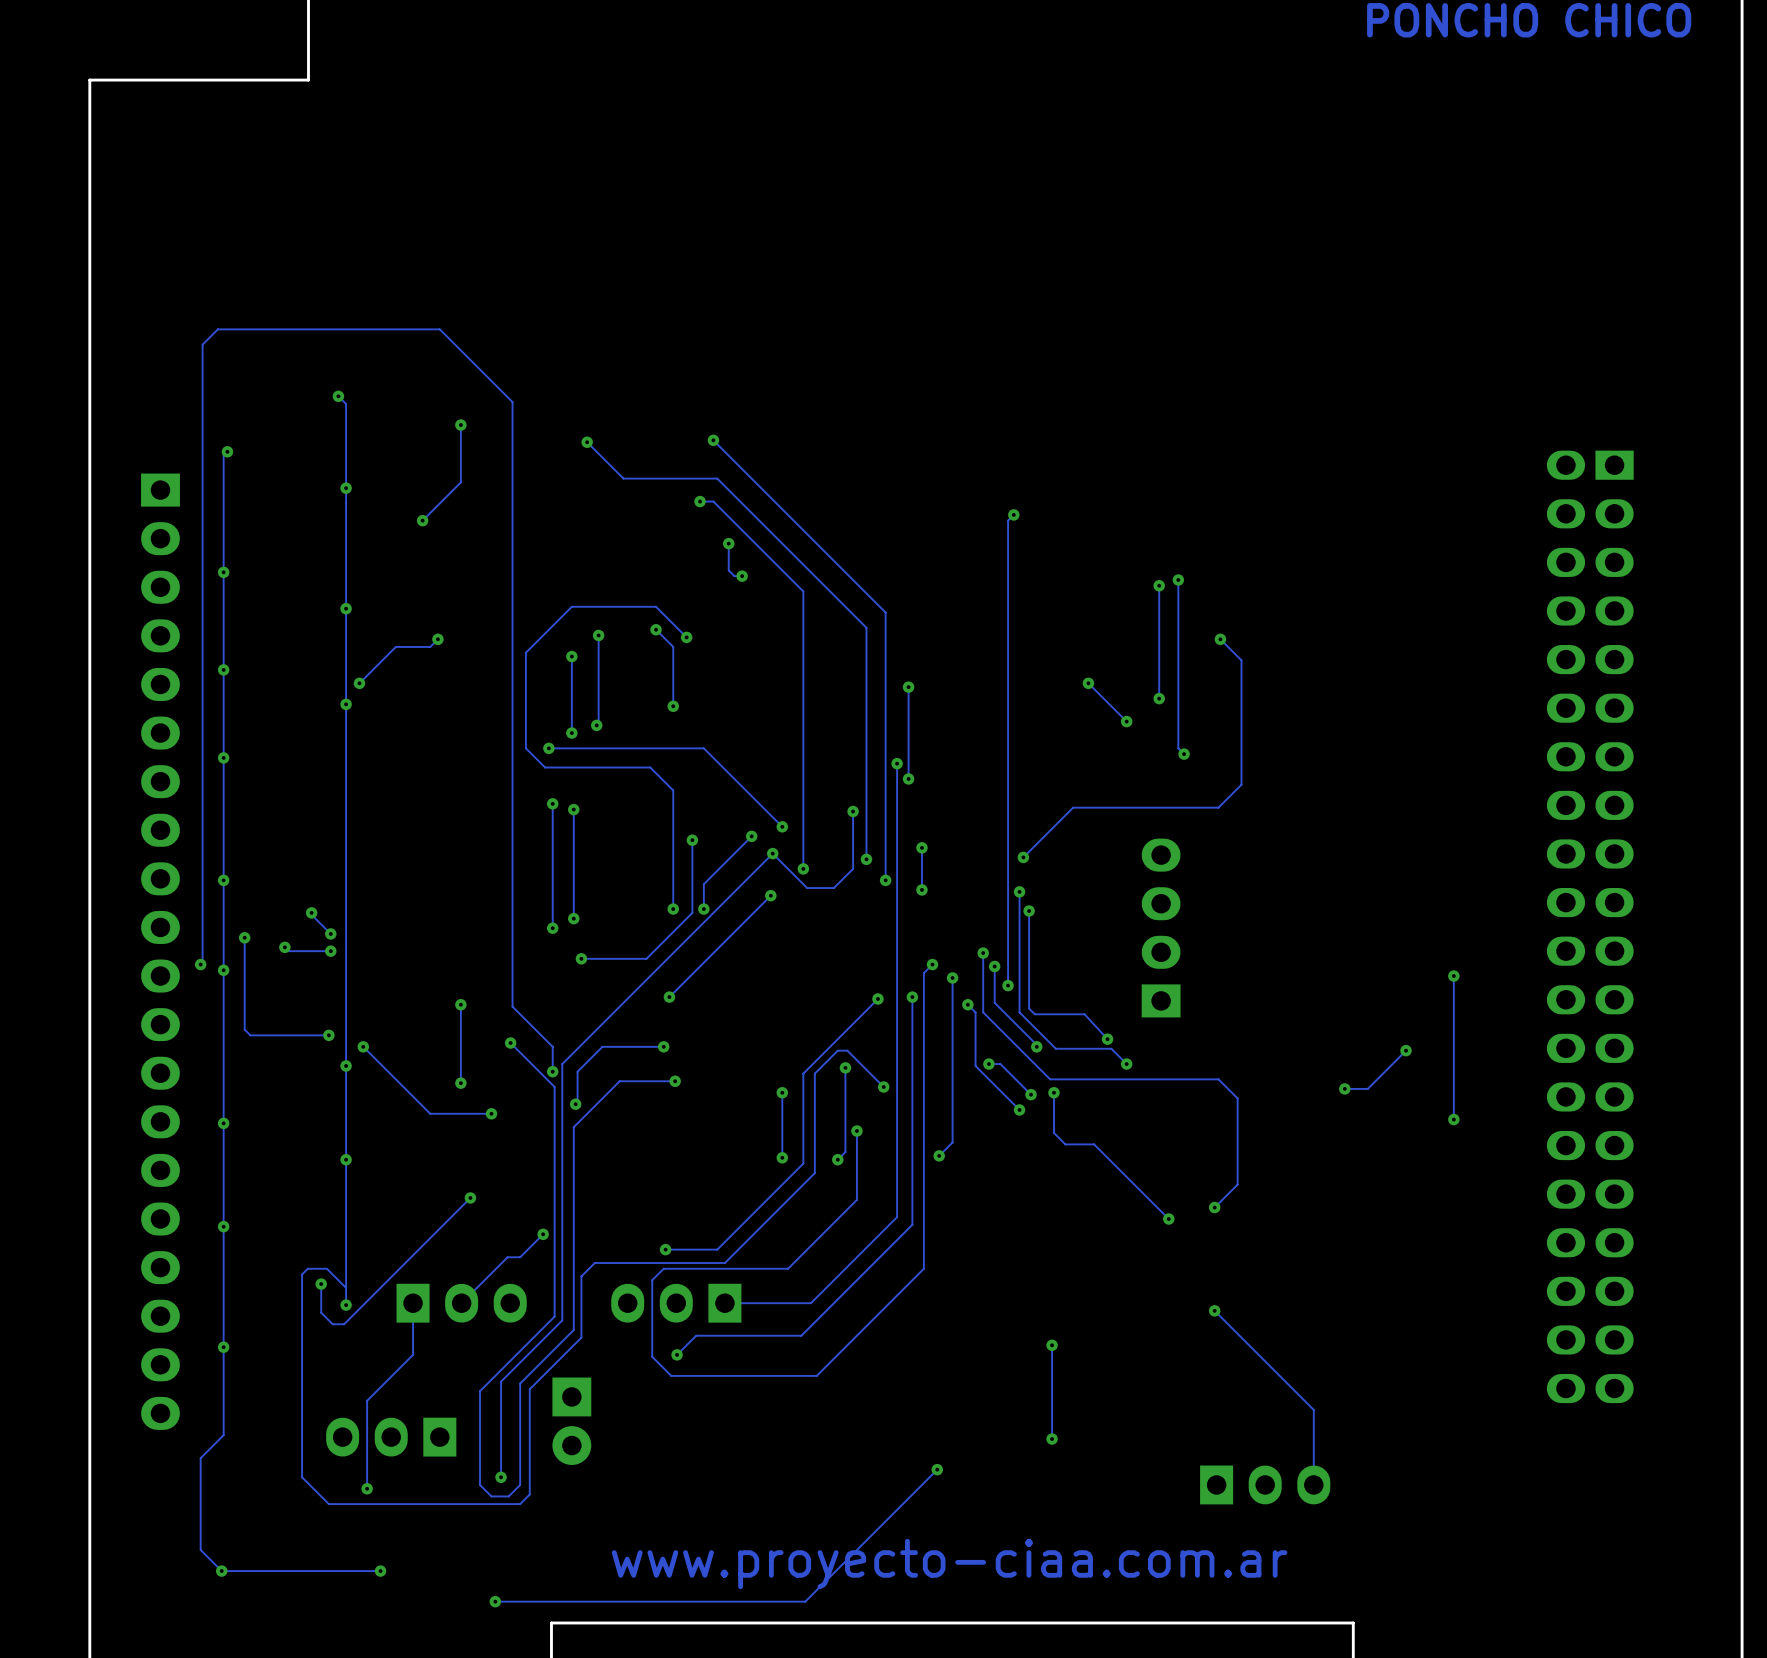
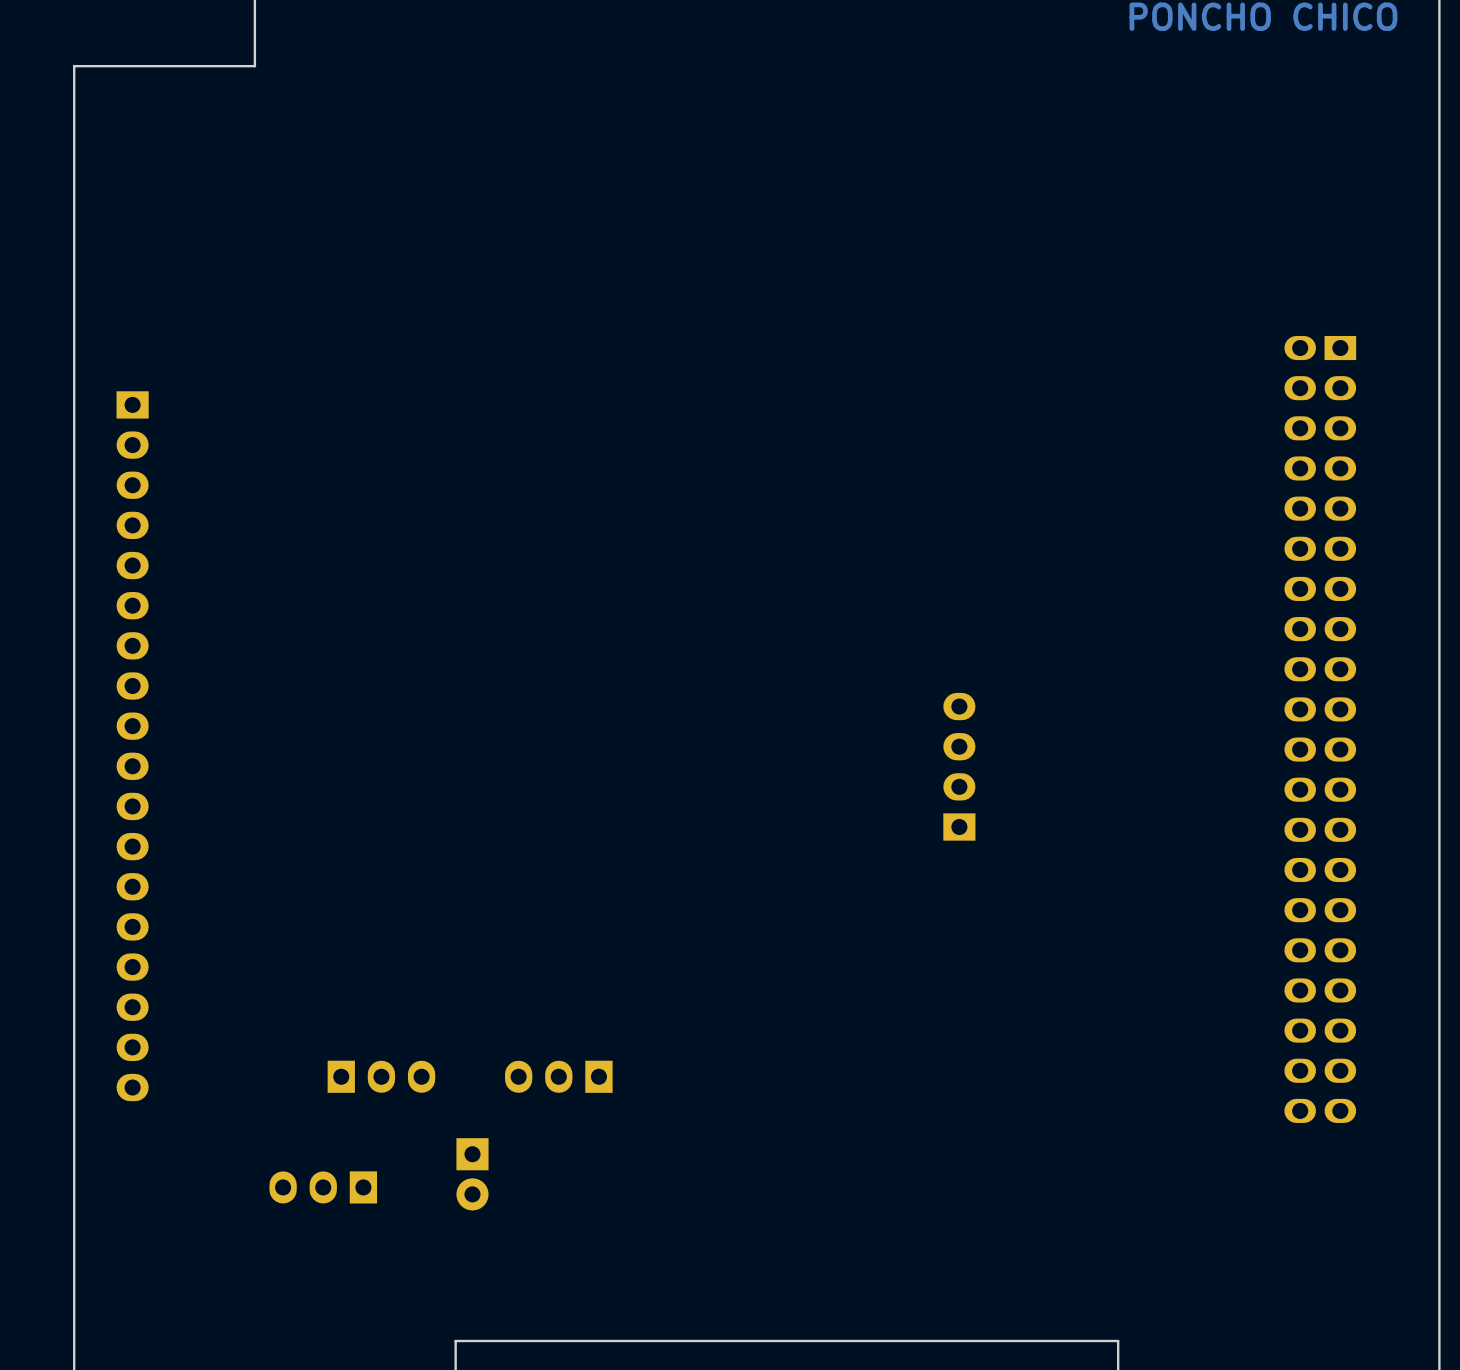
track: (338, 396) (346, 403) (346, 1305) -> none
via: (338, 396) -> none
track: (460, 425) (460, 482) (422, 520) -> none
via: (460, 425) -> none
track: (713, 440) (885, 612) (885, 880) -> none
via: (713, 440) -> none
track: (587, 442) (623, 478) (717, 478) (866, 627) (866, 859) -> none
via: (587, 442) -> none
track: (227, 451) (223, 455) (223, 1435) (200, 1458) (200, 1550) (221, 1571) (380, 1571) -> none
via: (227, 451) -> none
via: (346, 488) -> none
track: (700, 501) (713, 501) (803, 591) (803, 868) -> none
via: (700, 501) -> none
track: (1013, 514) (1008, 520) (1008, 985) -> none
via: (1013, 514) -> none
via: (422, 520) -> none
track: (728, 543) (728, 570) (734, 576) (742, 576) -> none
via: (728, 543) -> none
via: (223, 572) -> none
via: (742, 576) -> none
track: (1178, 580) (1178, 748) (1184, 754) -> none
via: (1178, 580) -> none
track: (1159, 585) (1159, 698) -> none
via: (1159, 585) -> none
via: (346, 608) -> none
track: (656, 629) (673, 646) (673, 706) -> none
via: (656, 629) -> none
track: (598, 635) (598, 723) (596, 725) -> none
via: (598, 635) -> none
track: (686, 637) (656, 606) (571, 606) (525, 652) (525, 748) (545, 767) (650, 767) (673, 790) (673, 909) -> none
via: (686, 637) -> none
track: (437, 639) (430, 646) (395, 646) (359, 683) -> none
via: (437, 639) -> none
track: (1220, 639) (1241, 660) (1241, 784) (1218, 807) (1073, 807) (1023, 857) -> none
via: (1220, 639) -> none
track: (571, 656) (571, 733) -> none
via: (571, 656) -> none
via: (223, 669) -> none
via: (359, 683) -> none
track: (1088, 683) (1126, 721) -> none
via: (1088, 683) -> none
track: (908, 687) (908, 778) -> none
via: (908, 687) -> none
via: (1159, 698) -> none
via: (346, 704) -> none
via: (673, 706) -> none
via: (1126, 721) -> none
via: (596, 725) -> none
via: (571, 733) -> none
track: (548, 748) (703, 748) (782, 826) -> none
via: (548, 748) -> none
via: (1184, 754) -> none
via: (223, 757) -> none
track: (897, 763) (897, 1217) (811, 1303) (724, 1303) -> none
via: (897, 763) -> none
via: (908, 778) -> none
track: (552, 803) (552, 928) -> none
via: (552, 803) -> none
track: (573, 809) (573, 918) -> none
via: (573, 809) -> none
track: (853, 811) (853, 868) (833, 888) (807, 888) (772, 853) (562, 1064) (562, 1320) (501, 1381) (501, 1477) -> none
via: (853, 811) -> none
via: (782, 826) -> none
track: (751, 836) (703, 884) (703, 909) -> none
via: (751, 836) -> none
track: (692, 840) (692, 912) (646, 958) (581, 958) -> none
via: (692, 840) -> none
track: (921, 847) (921, 889) -> none
via: (921, 847) -> none
via: (772, 853) -> none
via: (1023, 857) -> none
via: (866, 859) -> none
via: (803, 868) -> none
via: (223, 880) -> none
via: (885, 880) -> none
via: (921, 889) -> none
track: (1019, 891) (1019, 1012) (1055, 1048) (1111, 1048) (1126, 1064) -> none
via: (1019, 891) -> none
track: (770, 895) (669, 997) -> none
via: (770, 895) -> none
via: (673, 909) -> none
via: (703, 909) -> none
track: (1029, 910) (1029, 1008) (1034, 1014) (1084, 1014) (1107, 1039) -> none
via: (1029, 910) -> none
track: (311, 912) (330, 933) -> none
via: (311, 912) -> none
via: (573, 918) -> none
part position: (1590, 926) -> (1320, 729)
via: (552, 928) -> none
via: (330, 933) -> none
track: (244, 937) (244, 1029) (250, 1035) (328, 1035) -> none
via: (244, 937) -> none
track: (284, 947) (288, 951) (330, 951) -> none
via: (284, 947) -> none
part: (160, 951) -> none
via: (330, 951) -> none
track: (983, 953) (983, 1012) (1050, 1079) (1218, 1079) (1237, 1098) (1237, 1184) (1214, 1207) -> none
via: (983, 953) -> none
via: (581, 958) -> none
track: (200, 964) (202, 962) (202, 344) (217, 329) (439, 329) (512, 402) (512, 1006) (552, 1046) (552, 1071) -> none
via: (200, 964) -> none
track: (932, 964) (923, 973) (923, 1268) (816, 1375) (671, 1375) (652, 1356) (652, 1280) (663, 1268) (788, 1268) (856, 1199) (856, 1131) -> none
via: (932, 964) -> none
track: (994, 966) (994, 1002) (1036, 1046) -> none
via: (994, 966) -> none
via: (223, 970) -> none
track: (1453, 976) (1453, 1119) -> none
via: (1453, 976) -> none
track: (952, 977) (952, 1142) (939, 1155) -> none
via: (952, 977) -> none
via: (1008, 985) -> none
via: (669, 997) -> none
track: (912, 997) (912, 1224) (801, 1335) (696, 1335) (677, 1354) -> none
via: (912, 997) -> none
track: (877, 999) (803, 1073) (803, 1163) (717, 1249) (665, 1249) -> none
via: (877, 999) -> none
track: (460, 1004) (460, 1083) -> none
via: (460, 1004) -> none
track: (967, 1004) (975, 1012) (975, 1065) (1019, 1109) -> none
via: (967, 1004) -> none
via: (328, 1035) -> none
via: (1107, 1039) -> none
track: (510, 1043) (554, 1087) (554, 1316) (480, 1391) (480, 1484) (491, 1496) (508, 1496) (520, 1484) (520, 1383) (573, 1329) (573, 1127) (619, 1081) (675, 1081) -> none
via: (510, 1043) -> none
track: (363, 1046) (430, 1113) (491, 1113) -> none
via: (363, 1046) -> none
track: (663, 1046) (602, 1046) (577, 1071) (577, 1102) (575, 1104) -> none
via: (663, 1046) -> none
via: (1036, 1046) -> none
track: (1406, 1050) (1367, 1088) (1344, 1088) -> none
via: (1406, 1050) -> none
track: (988, 1064) (1000, 1064) (1031, 1094) -> none
via: (988, 1064) -> none
via: (1126, 1064) -> none
via: (346, 1065) -> none
track: (845, 1067) (845, 1152) (837, 1159) -> none
via: (845, 1067) -> none
via: (552, 1071) -> none
via: (675, 1081) -> none
via: (460, 1083) -> none
track: (883, 1087) (847, 1050) (837, 1050) (814, 1073) (814, 1173) (724, 1263) (594, 1263) (581, 1276) (581, 1337) (529, 1389) (529, 1494) (520, 1504) (328, 1504) (302, 1477) (302, 1274) (307, 1268) (326, 1268) (346, 1287) -> none
via: (883, 1087) -> none
via: (1344, 1088) -> none
track: (782, 1092) (782, 1157) -> none
via: (782, 1092) -> none
track: (1053, 1092) (1053, 1132) (1065, 1144) (1094, 1144) (1168, 1219) -> none
via: (1053, 1092) -> none
via: (1031, 1094) -> none
via: (575, 1104) -> none
via: (1019, 1109) -> none
via: (491, 1113) -> none
via: (1453, 1119) -> none
via: (223, 1123) -> none
via: (856, 1131) -> none
via: (939, 1155) -> none
via: (782, 1157) -> none
via: (346, 1159) -> none
via: (837, 1159) -> none
track: (470, 1197) (344, 1324) (332, 1324) (321, 1312) (321, 1284) -> none
via: (470, 1197) -> none
via: (1214, 1207) -> none
via: (1168, 1219) -> none
via: (223, 1226) -> none
track: (543, 1234) (520, 1257) (507, 1257) (461, 1303) -> none
via: (543, 1234) -> none
via: (665, 1249) -> none
via: (321, 1284) -> none
track: (405, 1303) (413, 1303) (413, 1354) (367, 1400) (367, 1488) -> none
via: (346, 1305) -> none
track: (1214, 1310) (1313, 1409) (1313, 1484) -> none
via: (1214, 1310) -> none
track: (1052, 1345) (1052, 1439) -> none
via: (1052, 1345) -> none
via: (223, 1347) -> none
via: (677, 1354) -> none
via: (1052, 1439) -> none
track: (937, 1469) (805, 1601) (495, 1601) -> none
via: (937, 1469) -> none
via: (501, 1477) -> none
part: (1265, 1484) -> none
via: (367, 1488) -> none
text: www.proyecto-ciaa.com.ar (949, 1563) -> none
via: (221, 1571) -> none
via: (380, 1571) -> none
via: (495, 1601) -> none

